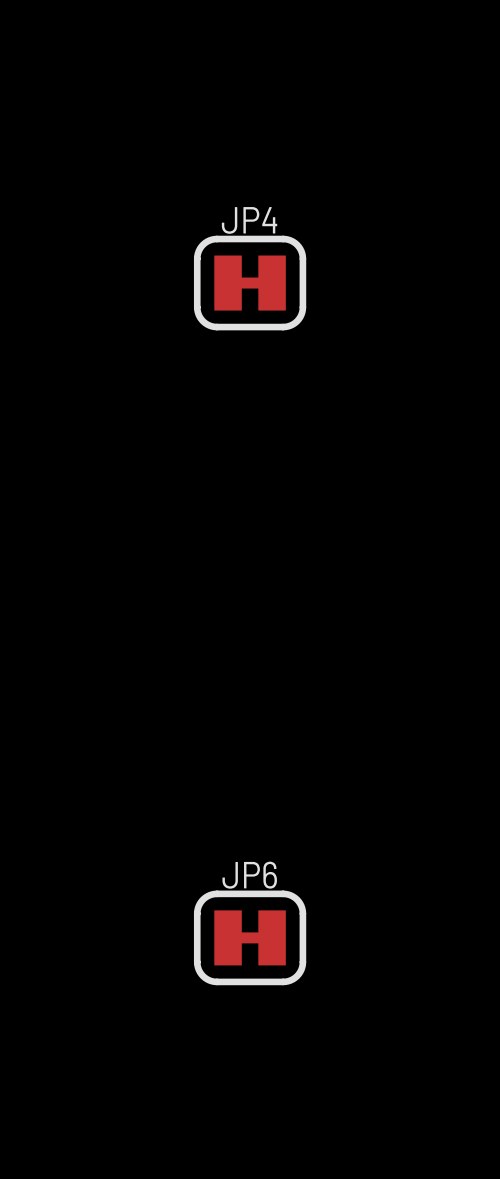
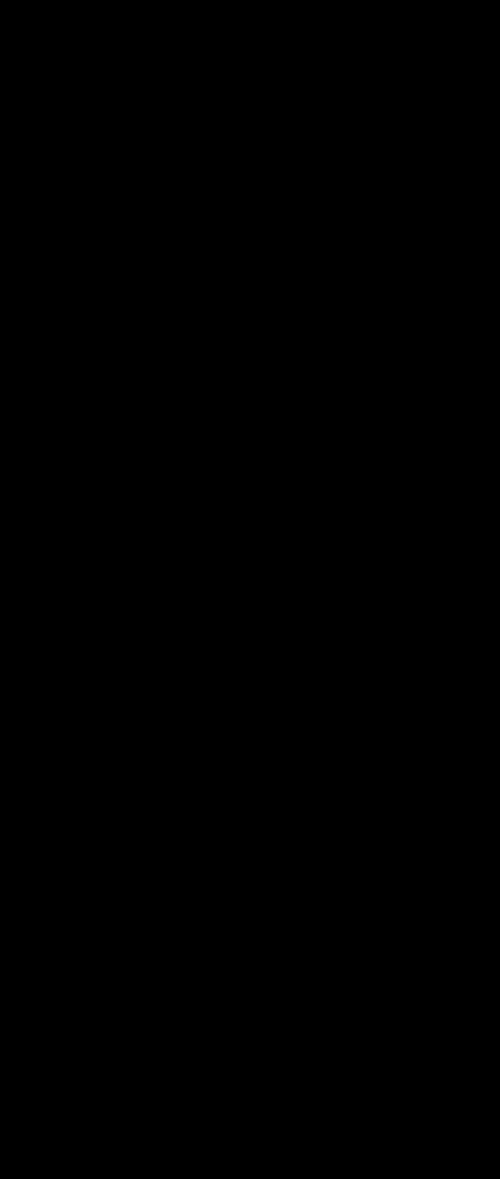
JP4: (250, 283) -> none
JP6: (250, 937) -> none

